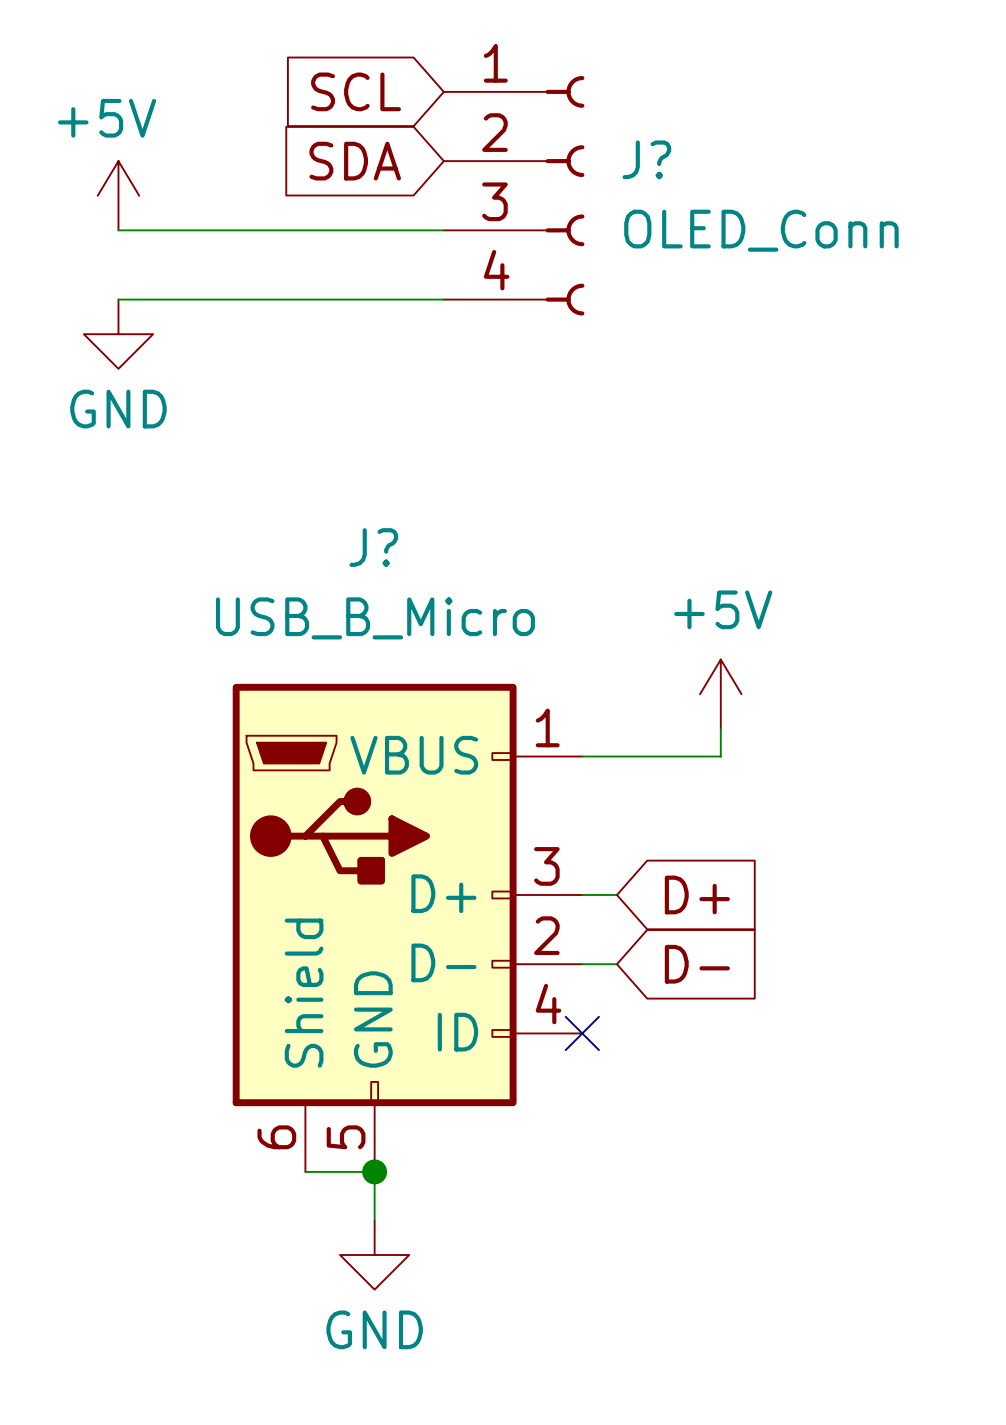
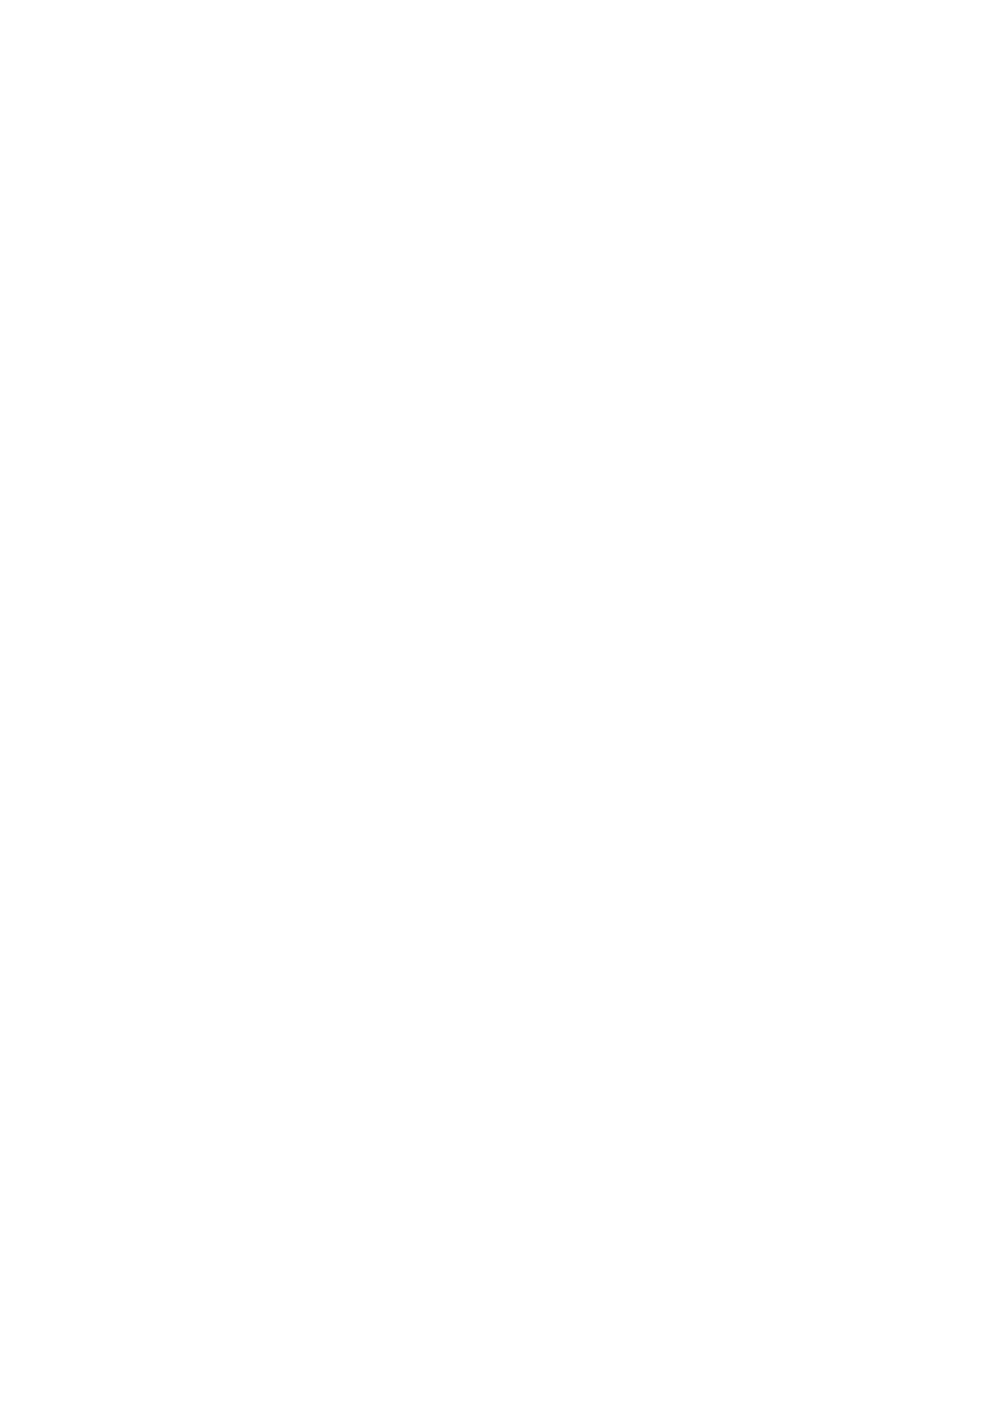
global label: SCL (356, 91) -> none
global label: SDA (355, 161) -> none
power symbol: +5V (118, 195) -> none
J?: OLED_Conn (514, 195) -> none
wire: (118, 230) (443, 230) -> none
wire: (118, 299) (443, 299) -> none
power symbol: GND (118, 334) -> none
power symbol: +5V (720, 694) -> none
wire: (720, 728) (720, 756) (582, 756) -> none
wire: (582, 894) (616, 894) -> none
global label: D+ (697, 894) -> none
J?: USB_B_Micro (407, 927) -> none
wire: (582, 964) (616, 964) -> none
global label: D- (697, 964) -> none
no-connect mark: (582, 1033) -> none
wire: (305, 1171) (374, 1171) (374, 1220) -> none
junction: (374, 1171) -> none
power symbol: GND (374, 1255) -> none

